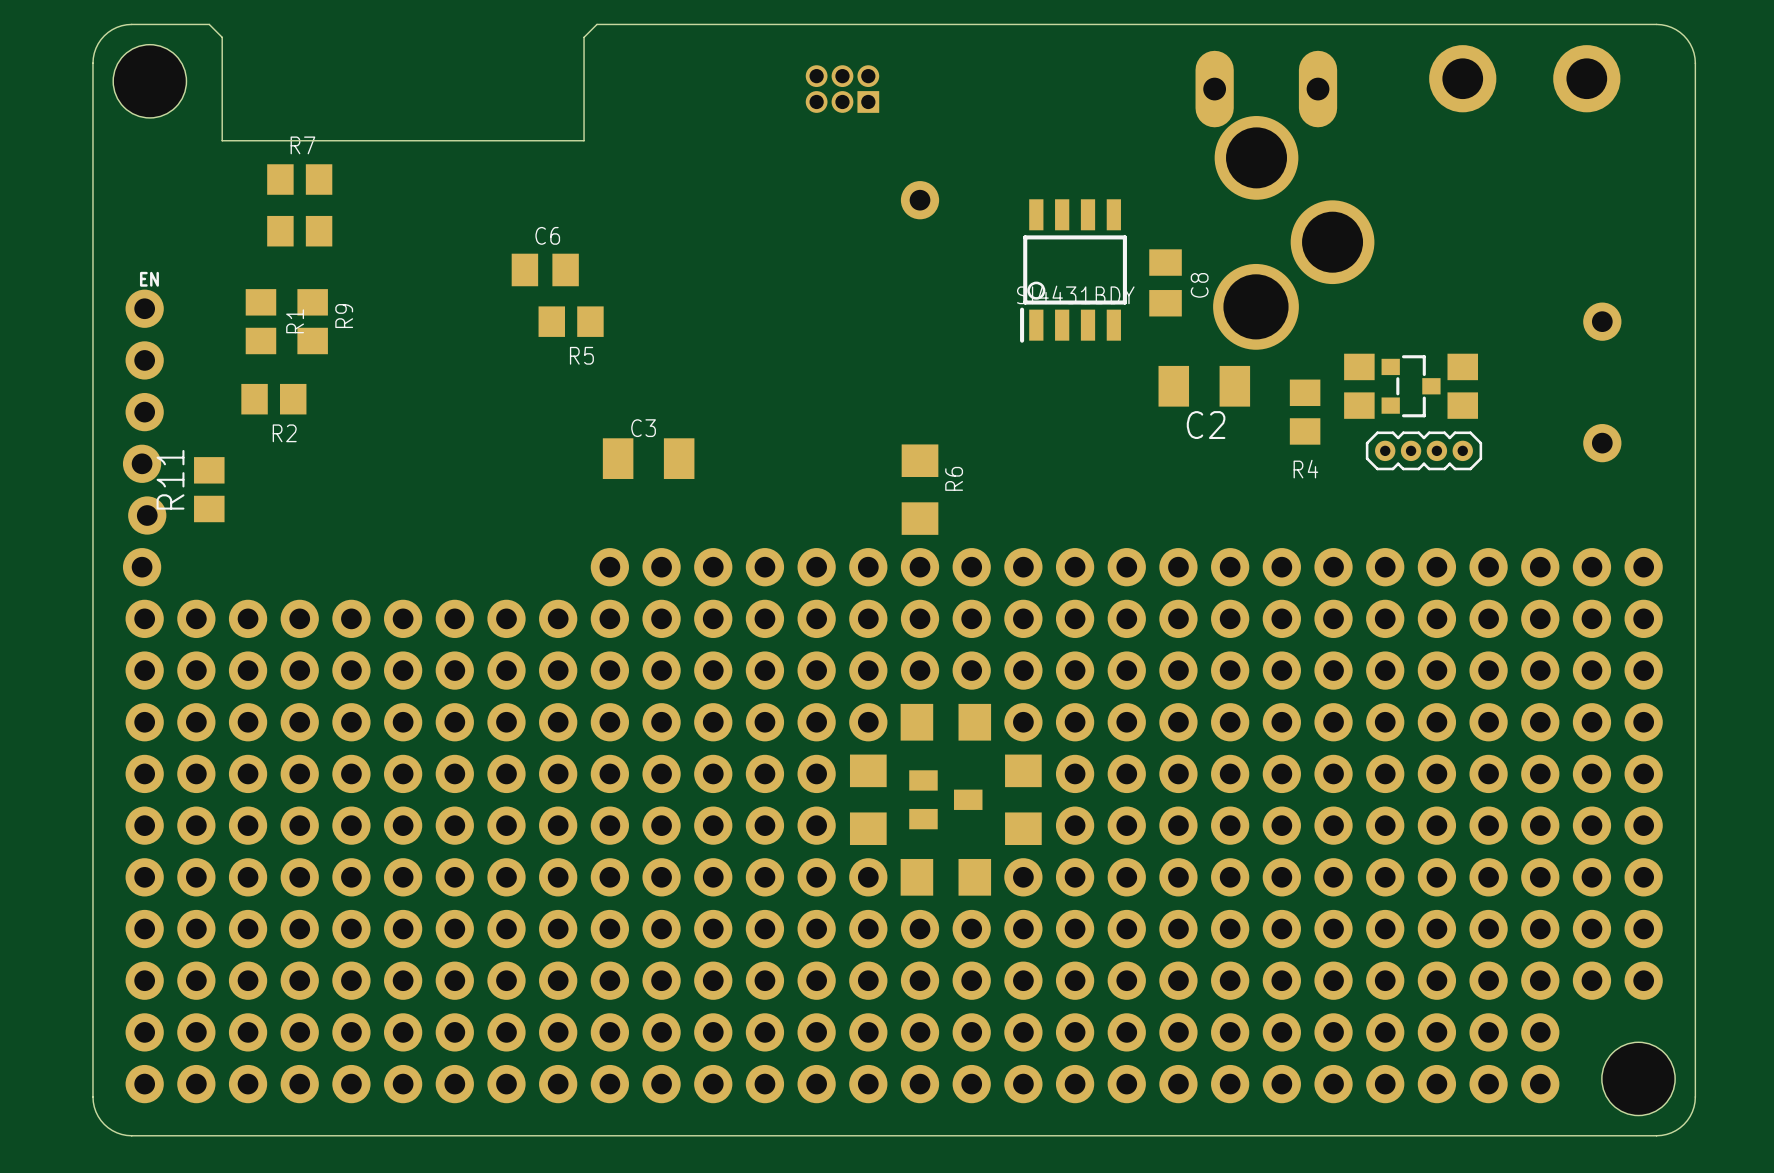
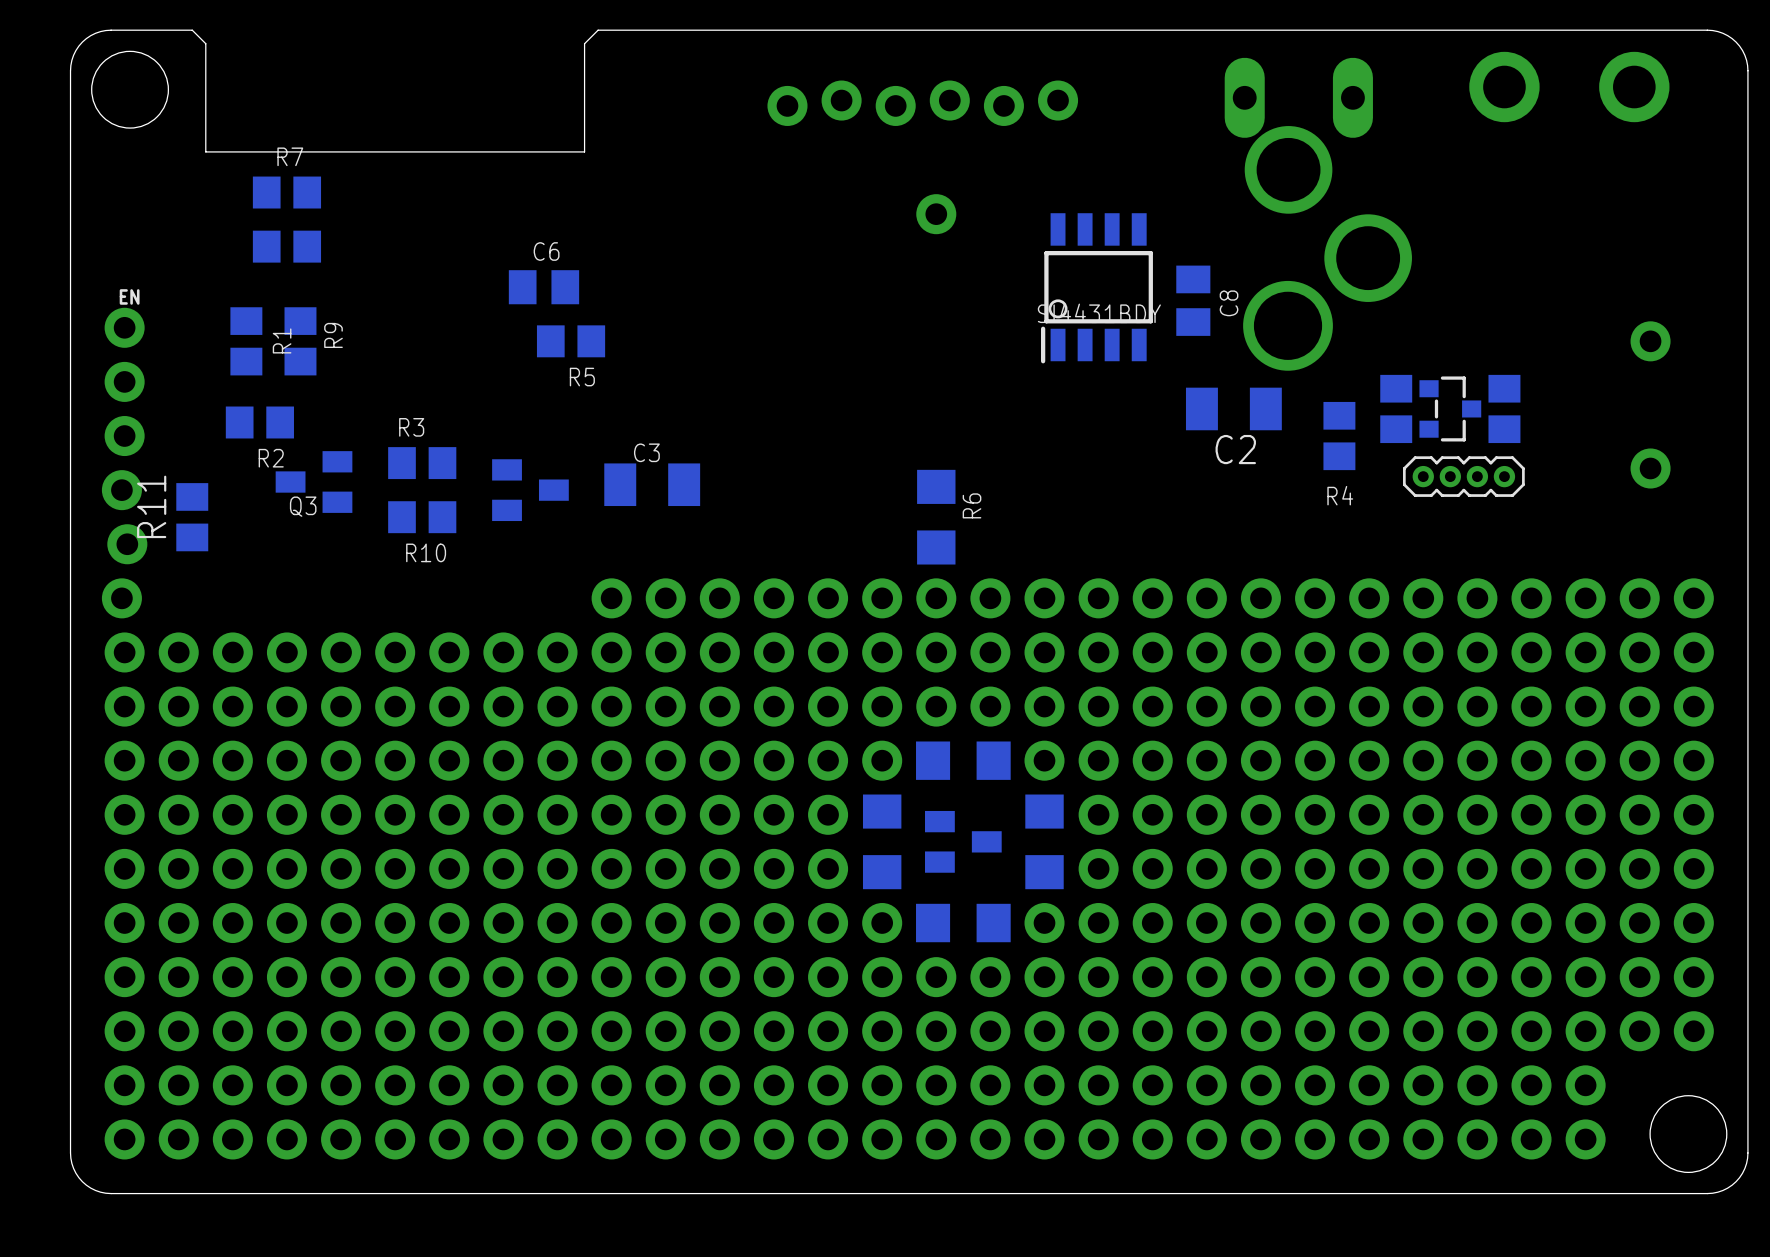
part: (842, 89) -> none
part: none -> (922, 103)
R3: none -> (422, 463)
Q3: none -> (314, 482)
part: none -> (530, 490)
R10: none -> (422, 517)

